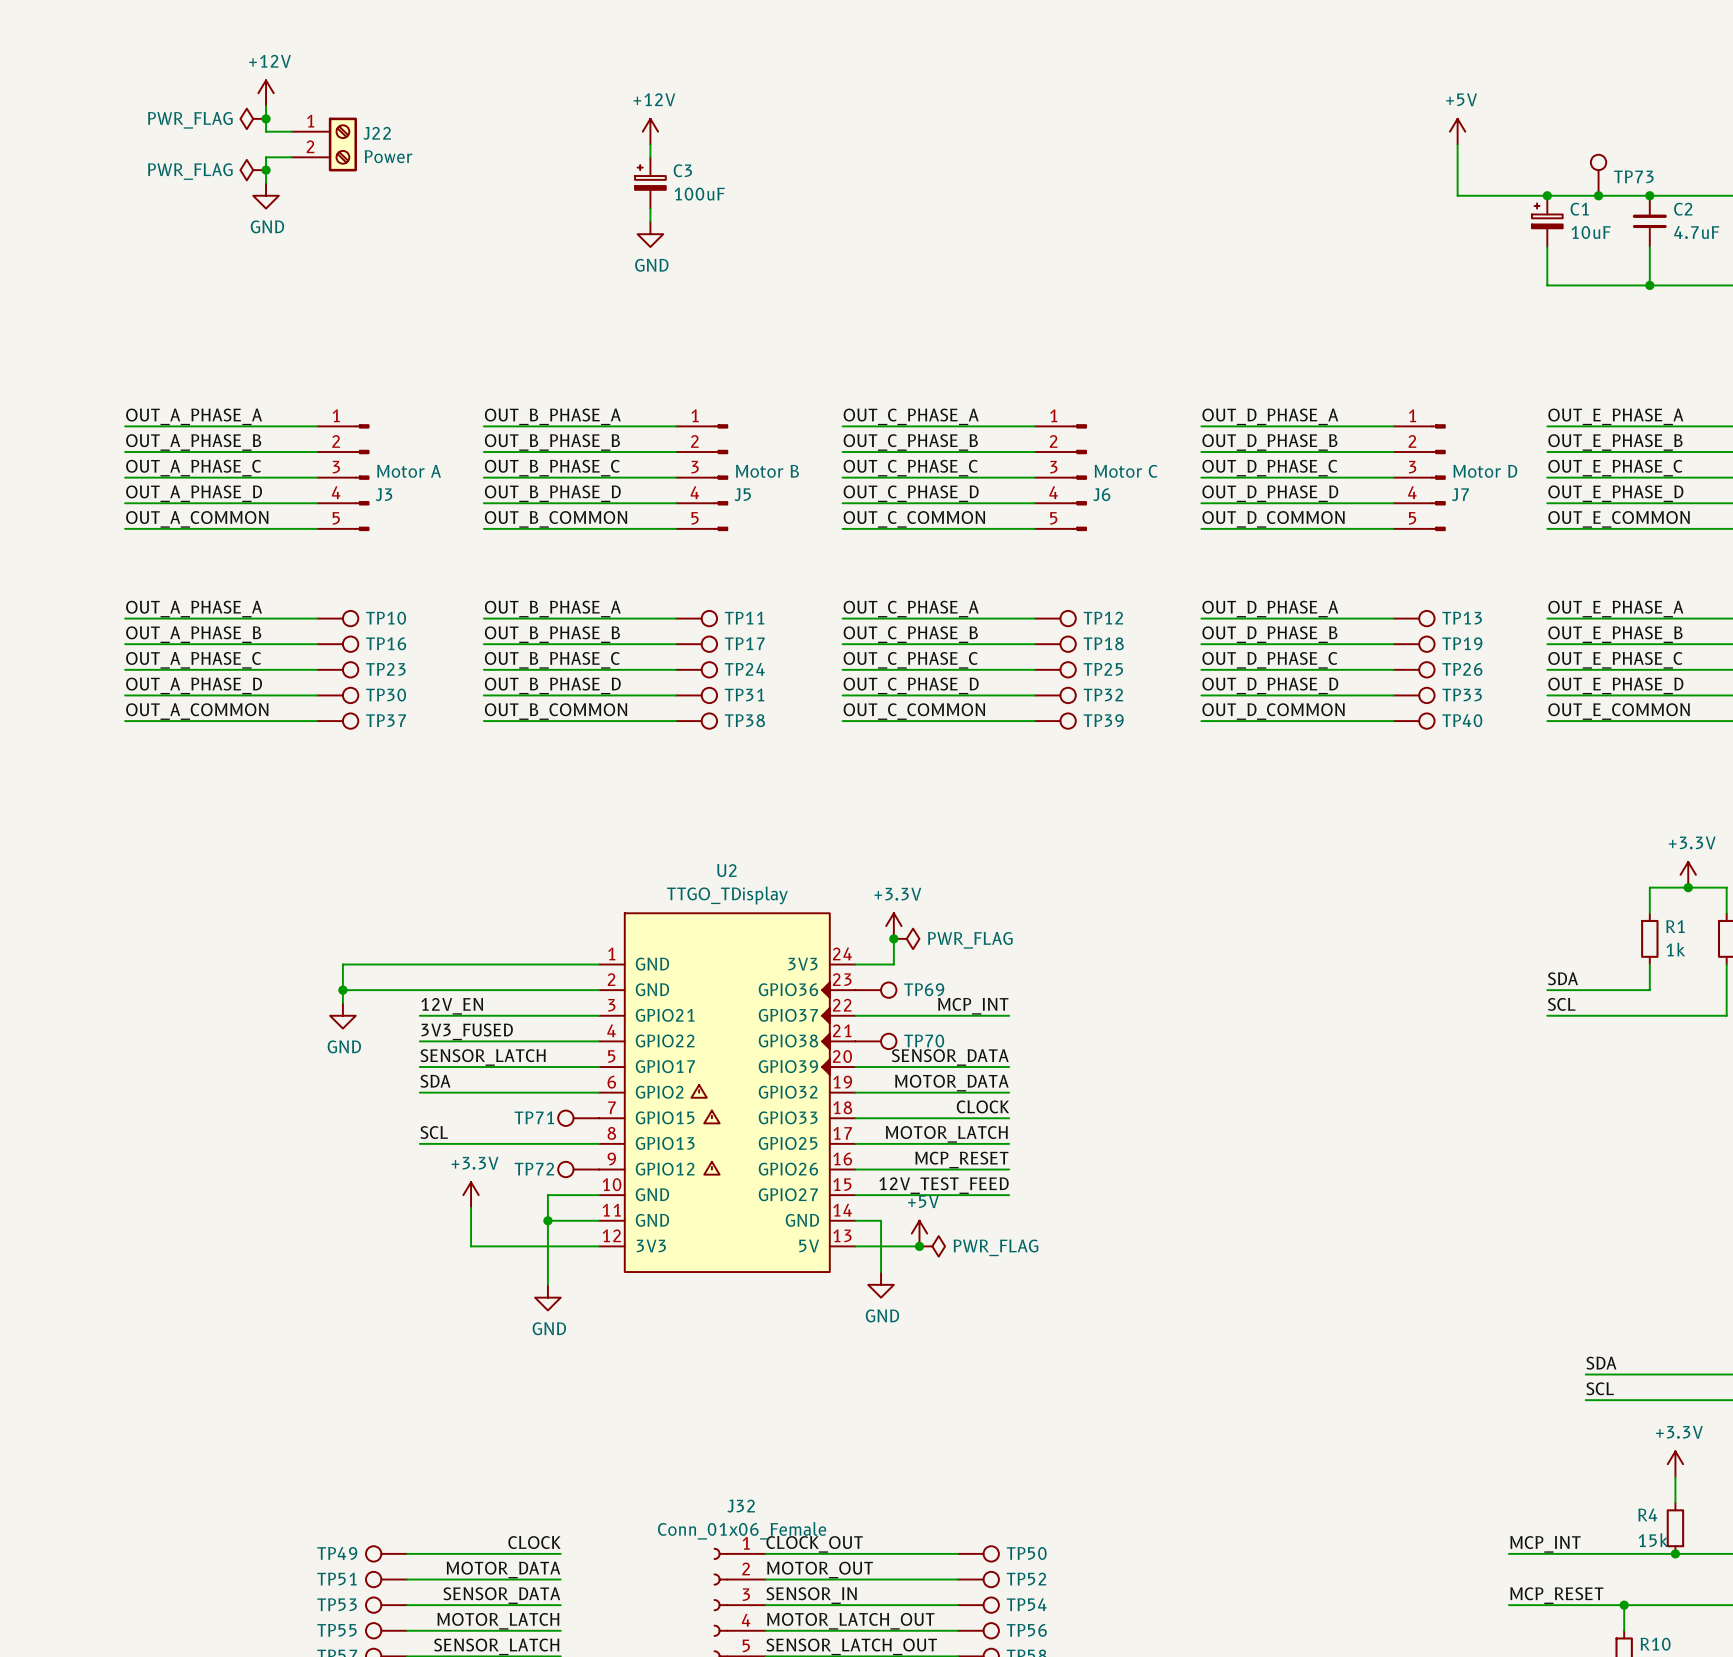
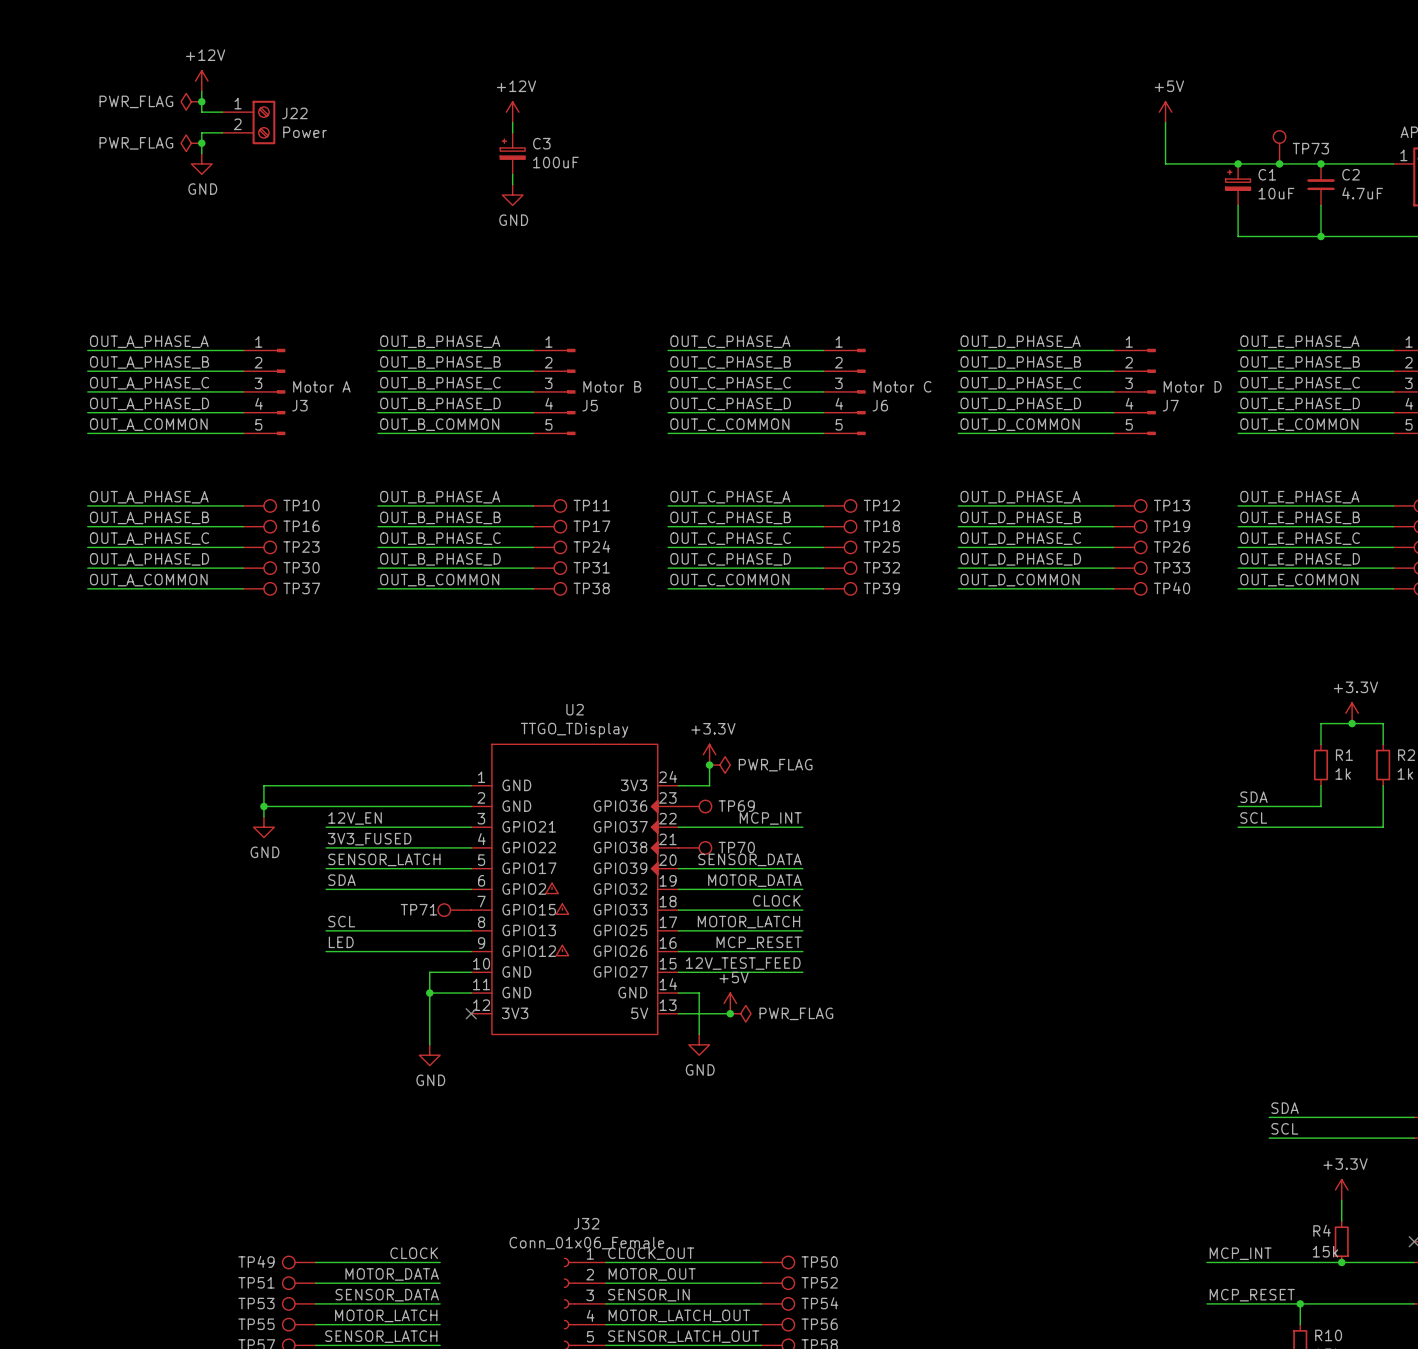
label: none -> LED (341, 942)
wire: none -> (326, 951) (471, 951)
TP72: (578, 1169) -> none
power symbol: +3.3V (471, 1195) -> none
wire: (471, 1207) (471, 1246) (599, 1246) -> none
no-connect mark: none -> (471, 1013)

